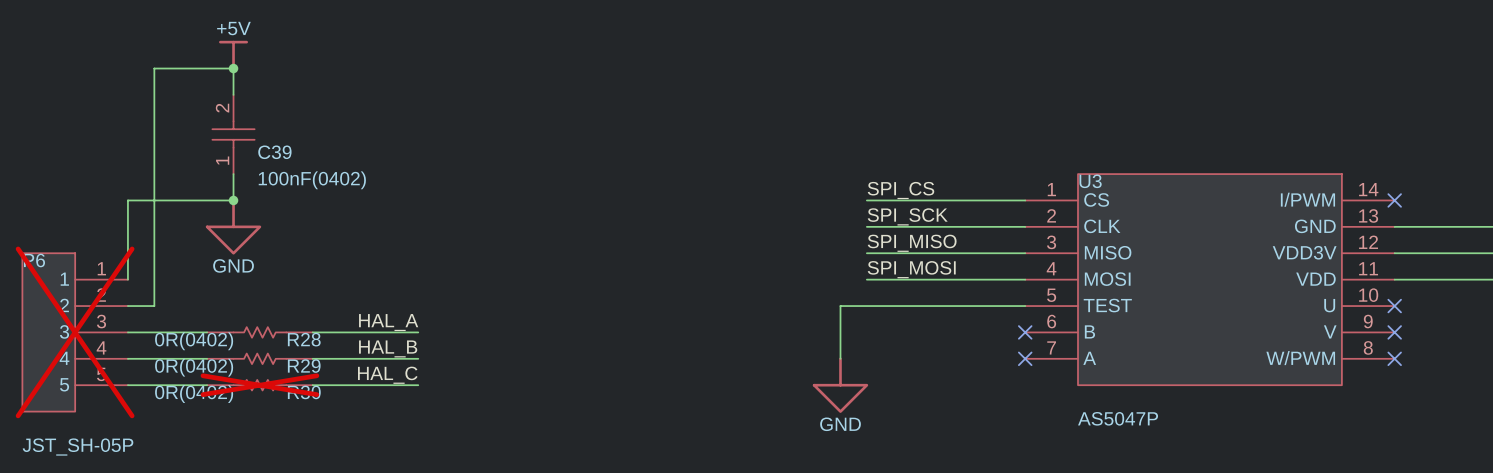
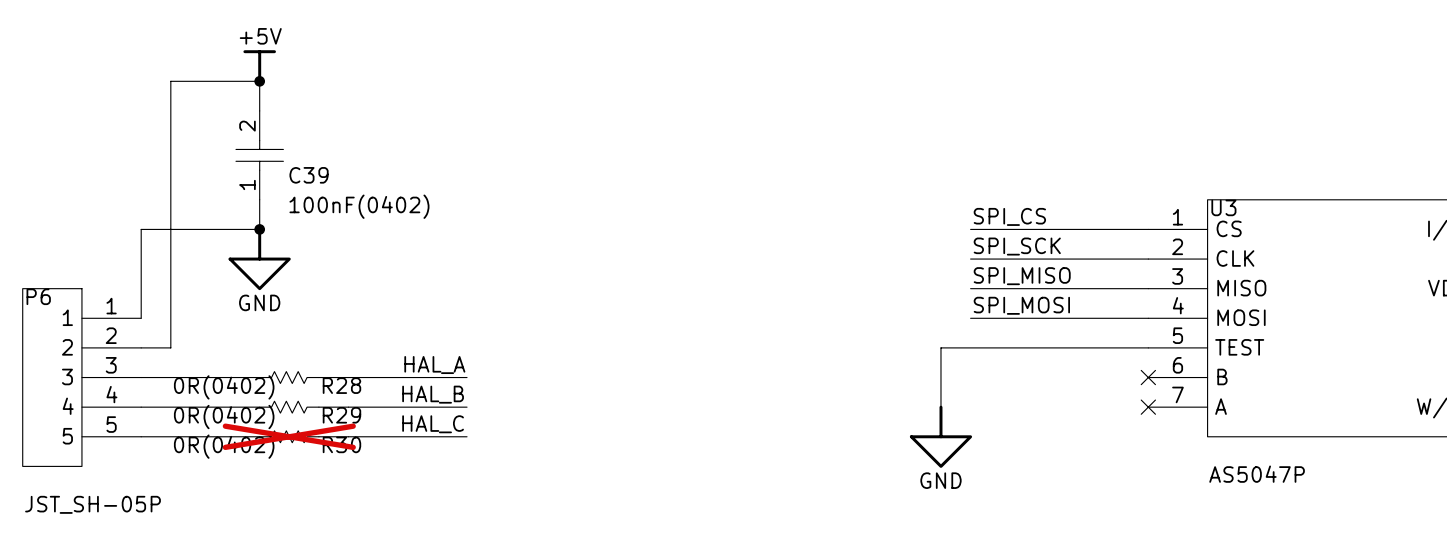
P6 do-not-place cross: (75, 332) -> none

